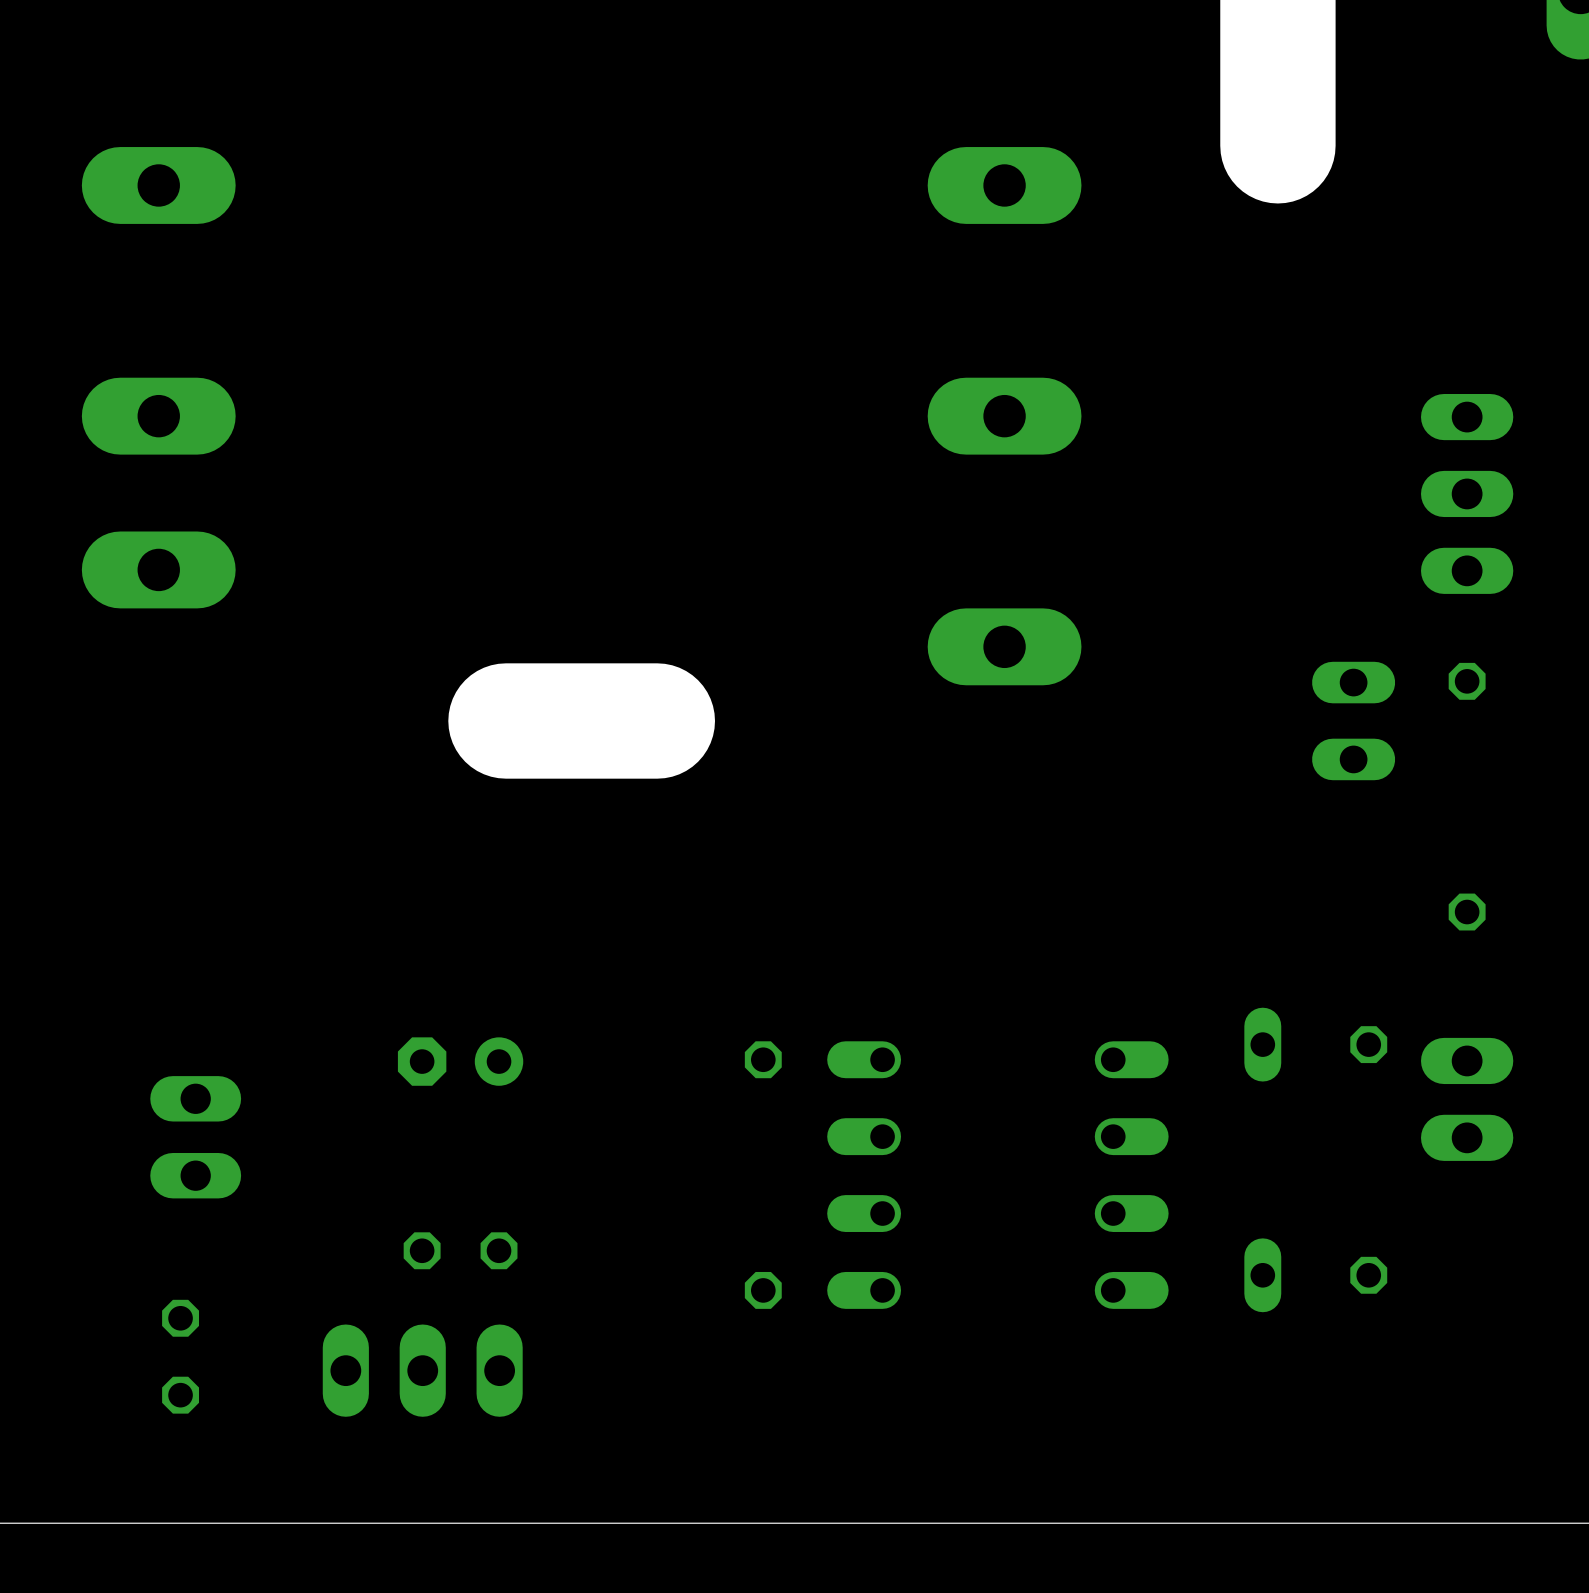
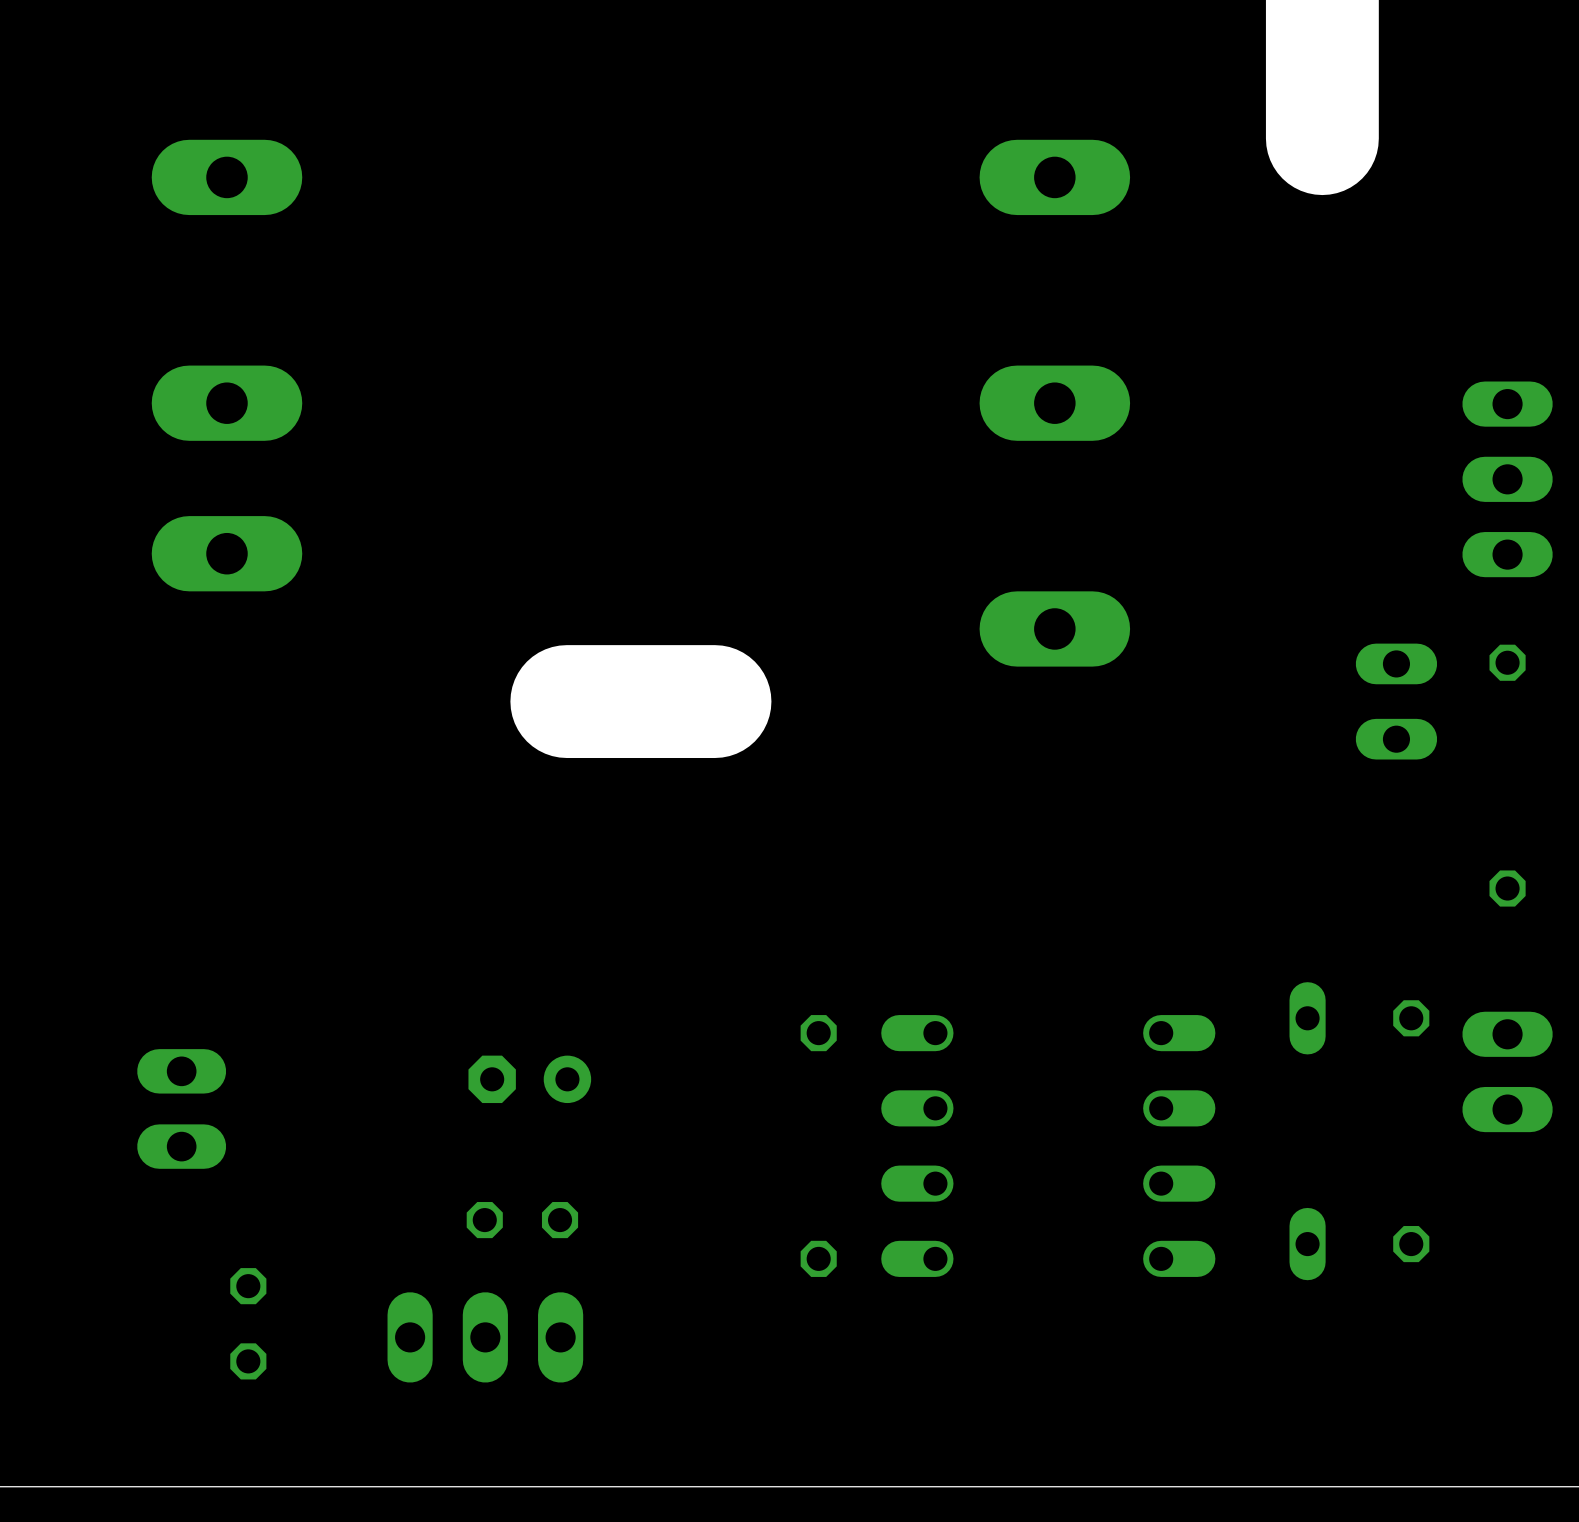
part position: (460, 1061) -> (529, 1079)
part position: (195, 1137) -> (181, 1108)

